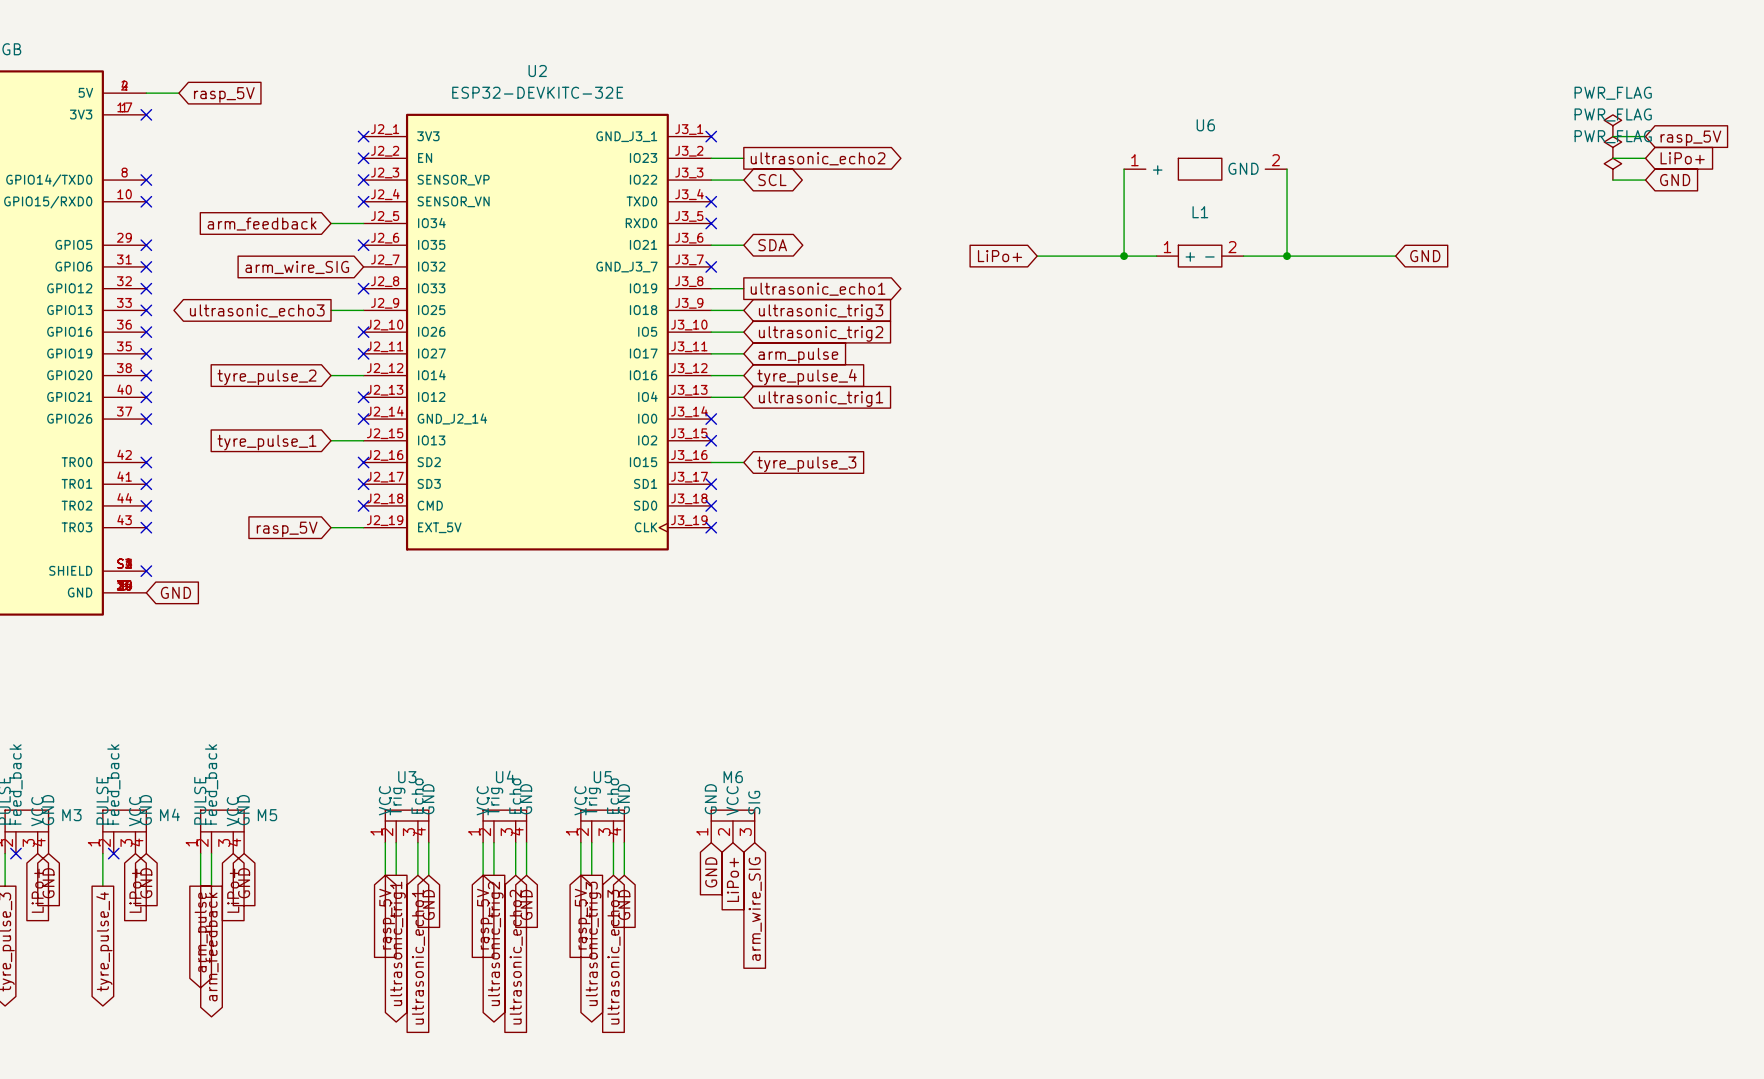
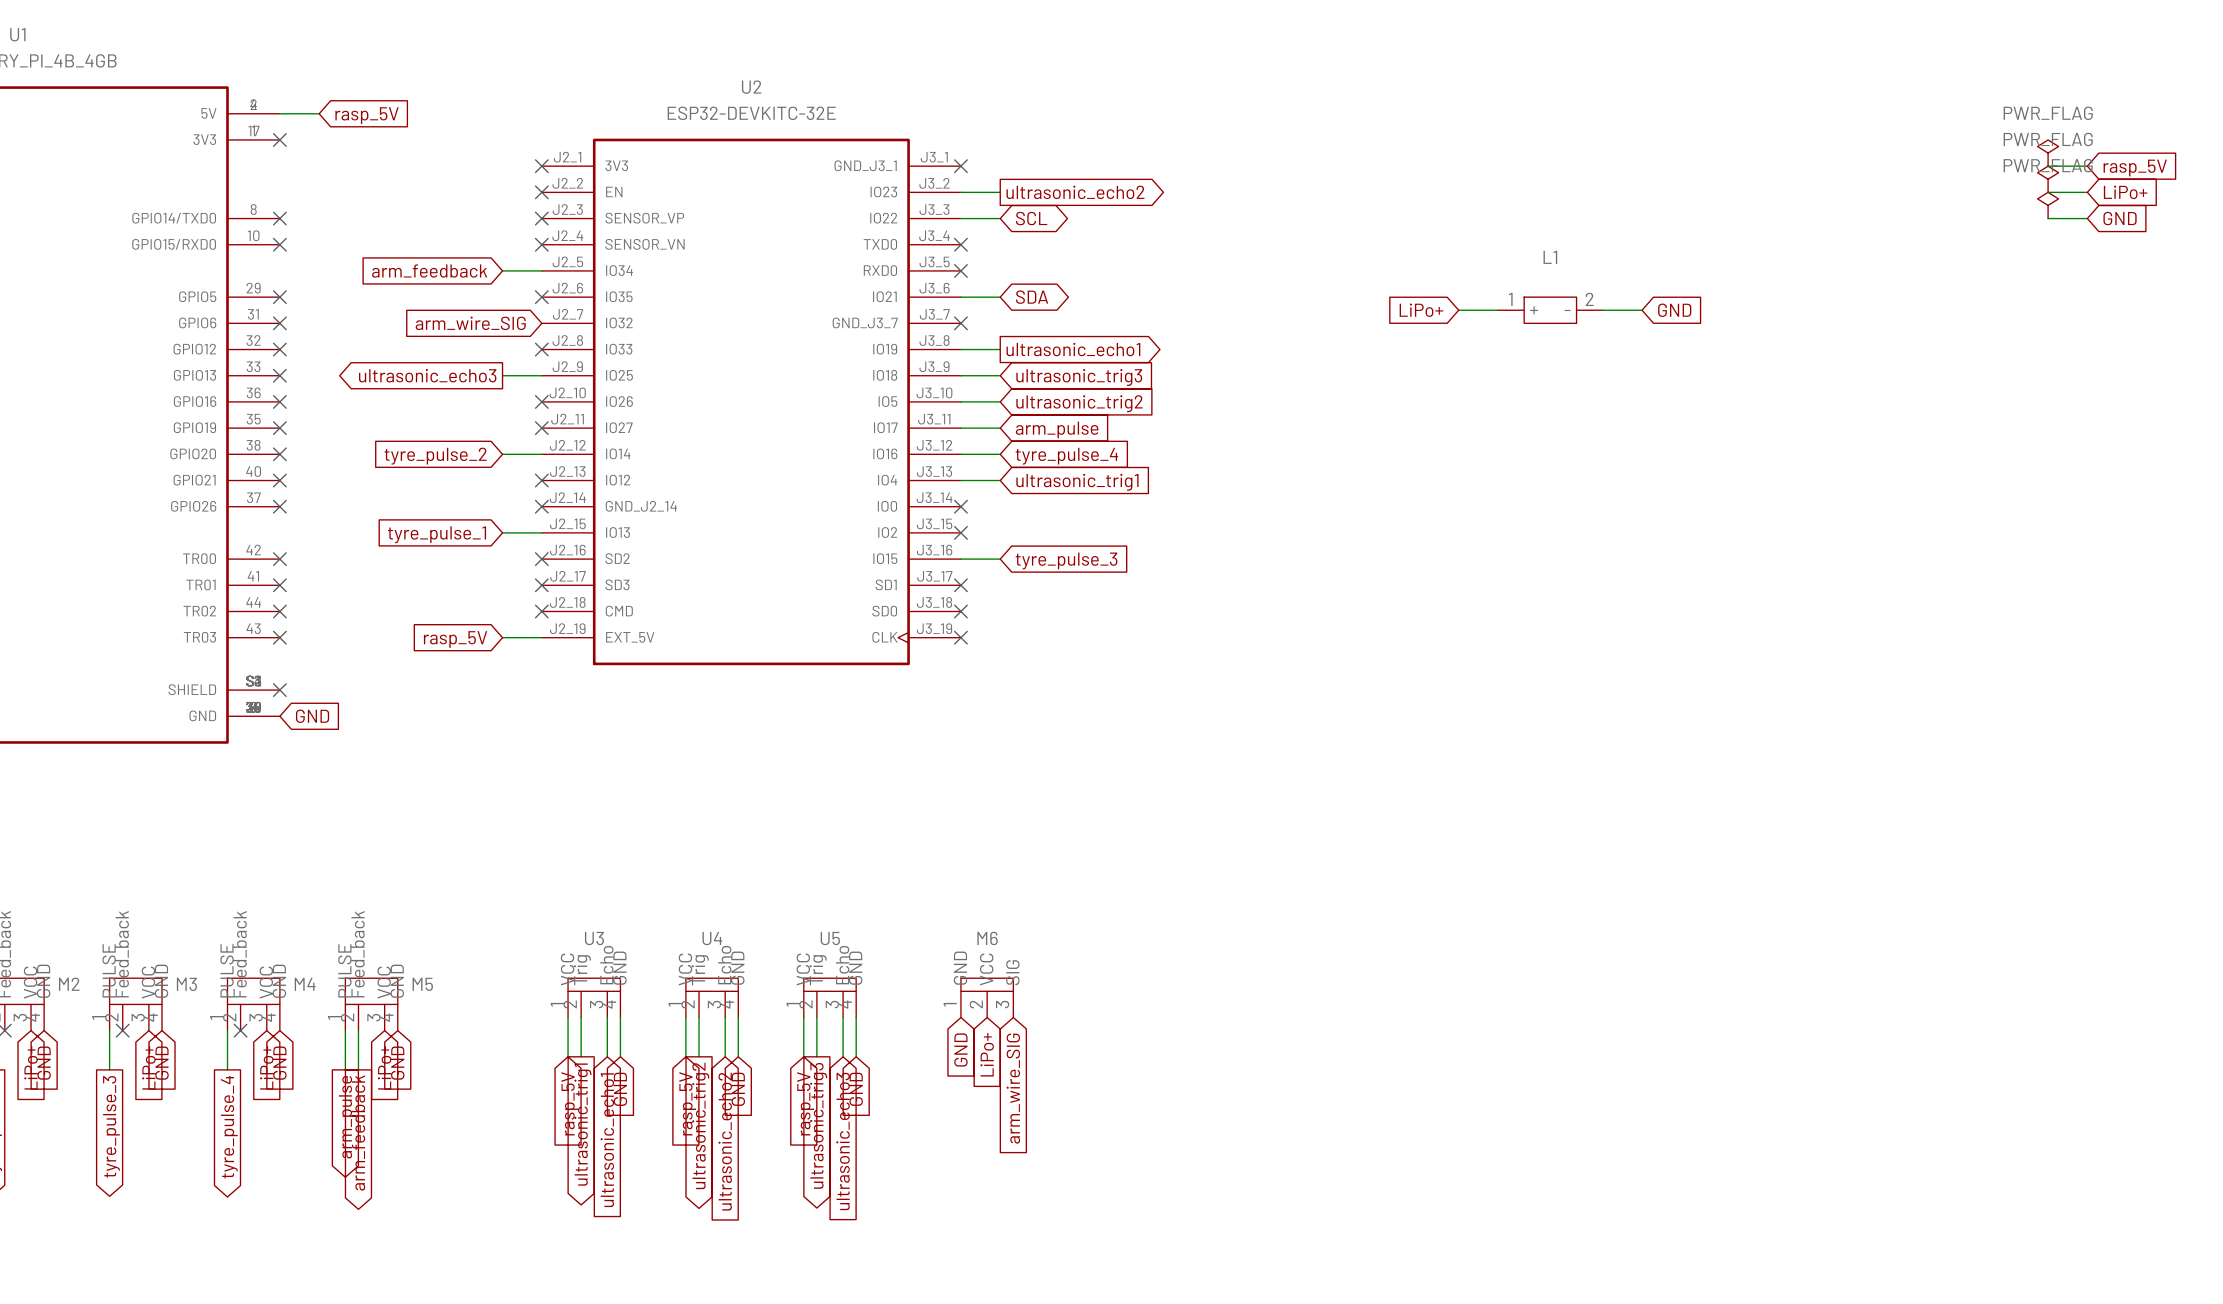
wire: (1124, 169) (1124, 256) (1037, 256) -> none
U6: (1205, 169) -> none
wire: (1287, 169) (1287, 256) -> none
global label position: LiPo+ (1000, 256) -> LiPo+ (1421, 310)
junction: (1124, 256) -> none
wire: (1276, 256) (1395, 256) -> none
junction: (1287, 256) -> none
global label position: GND (1425, 256) -> GND (1674, 310)

